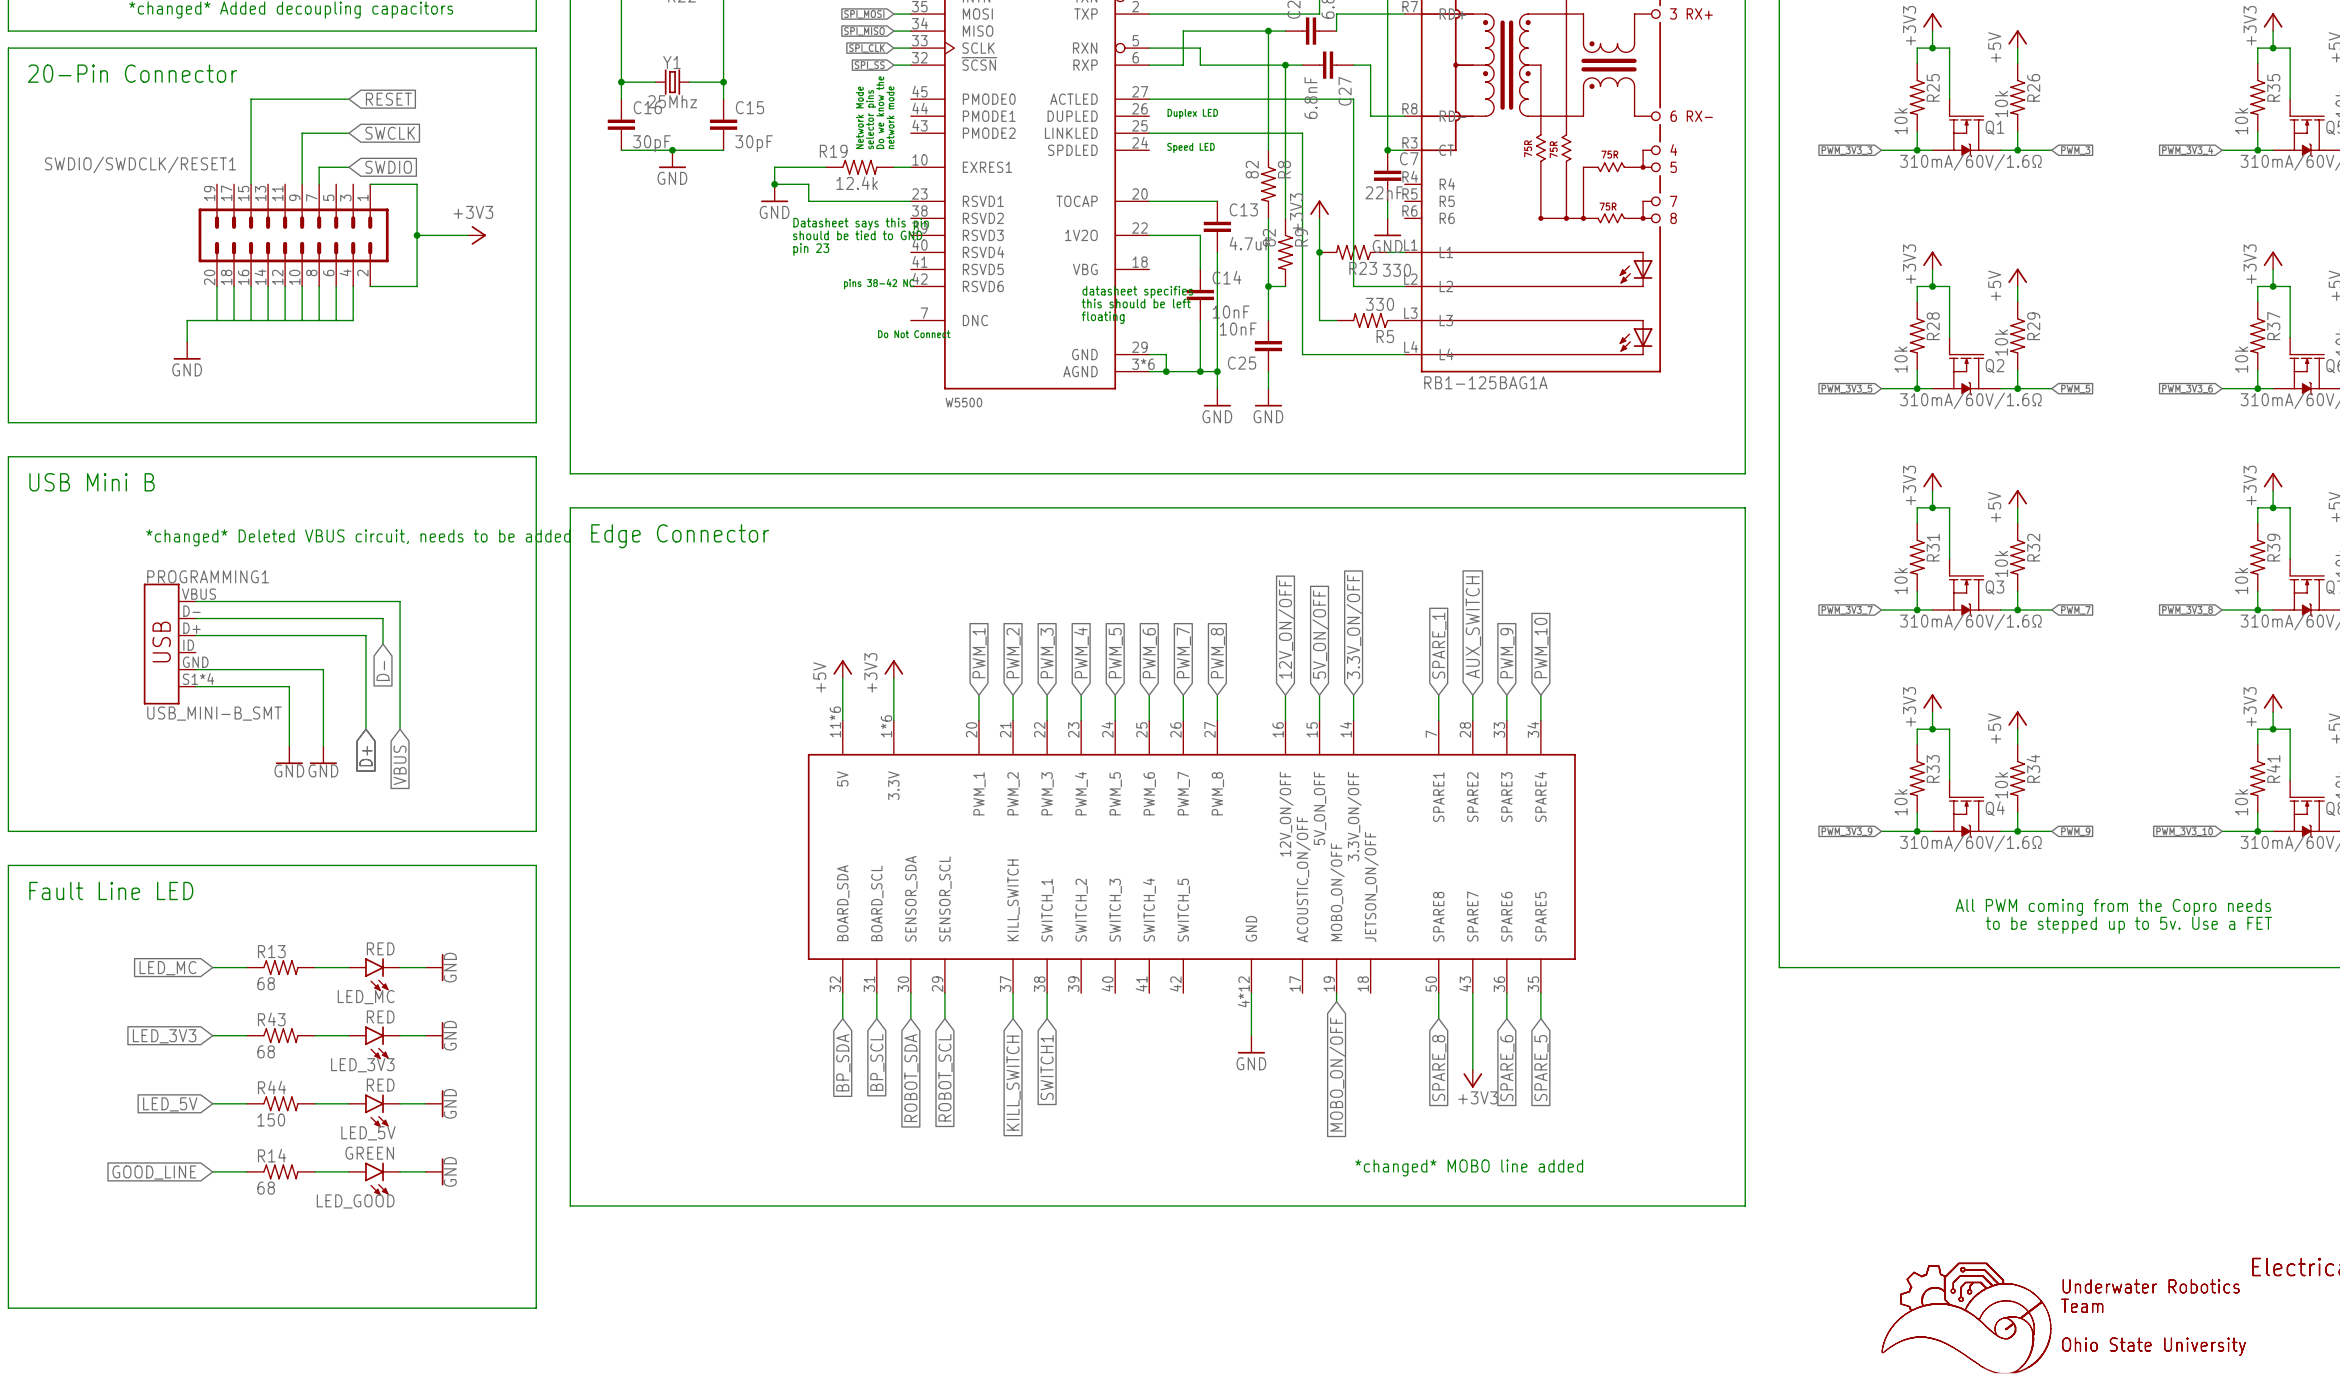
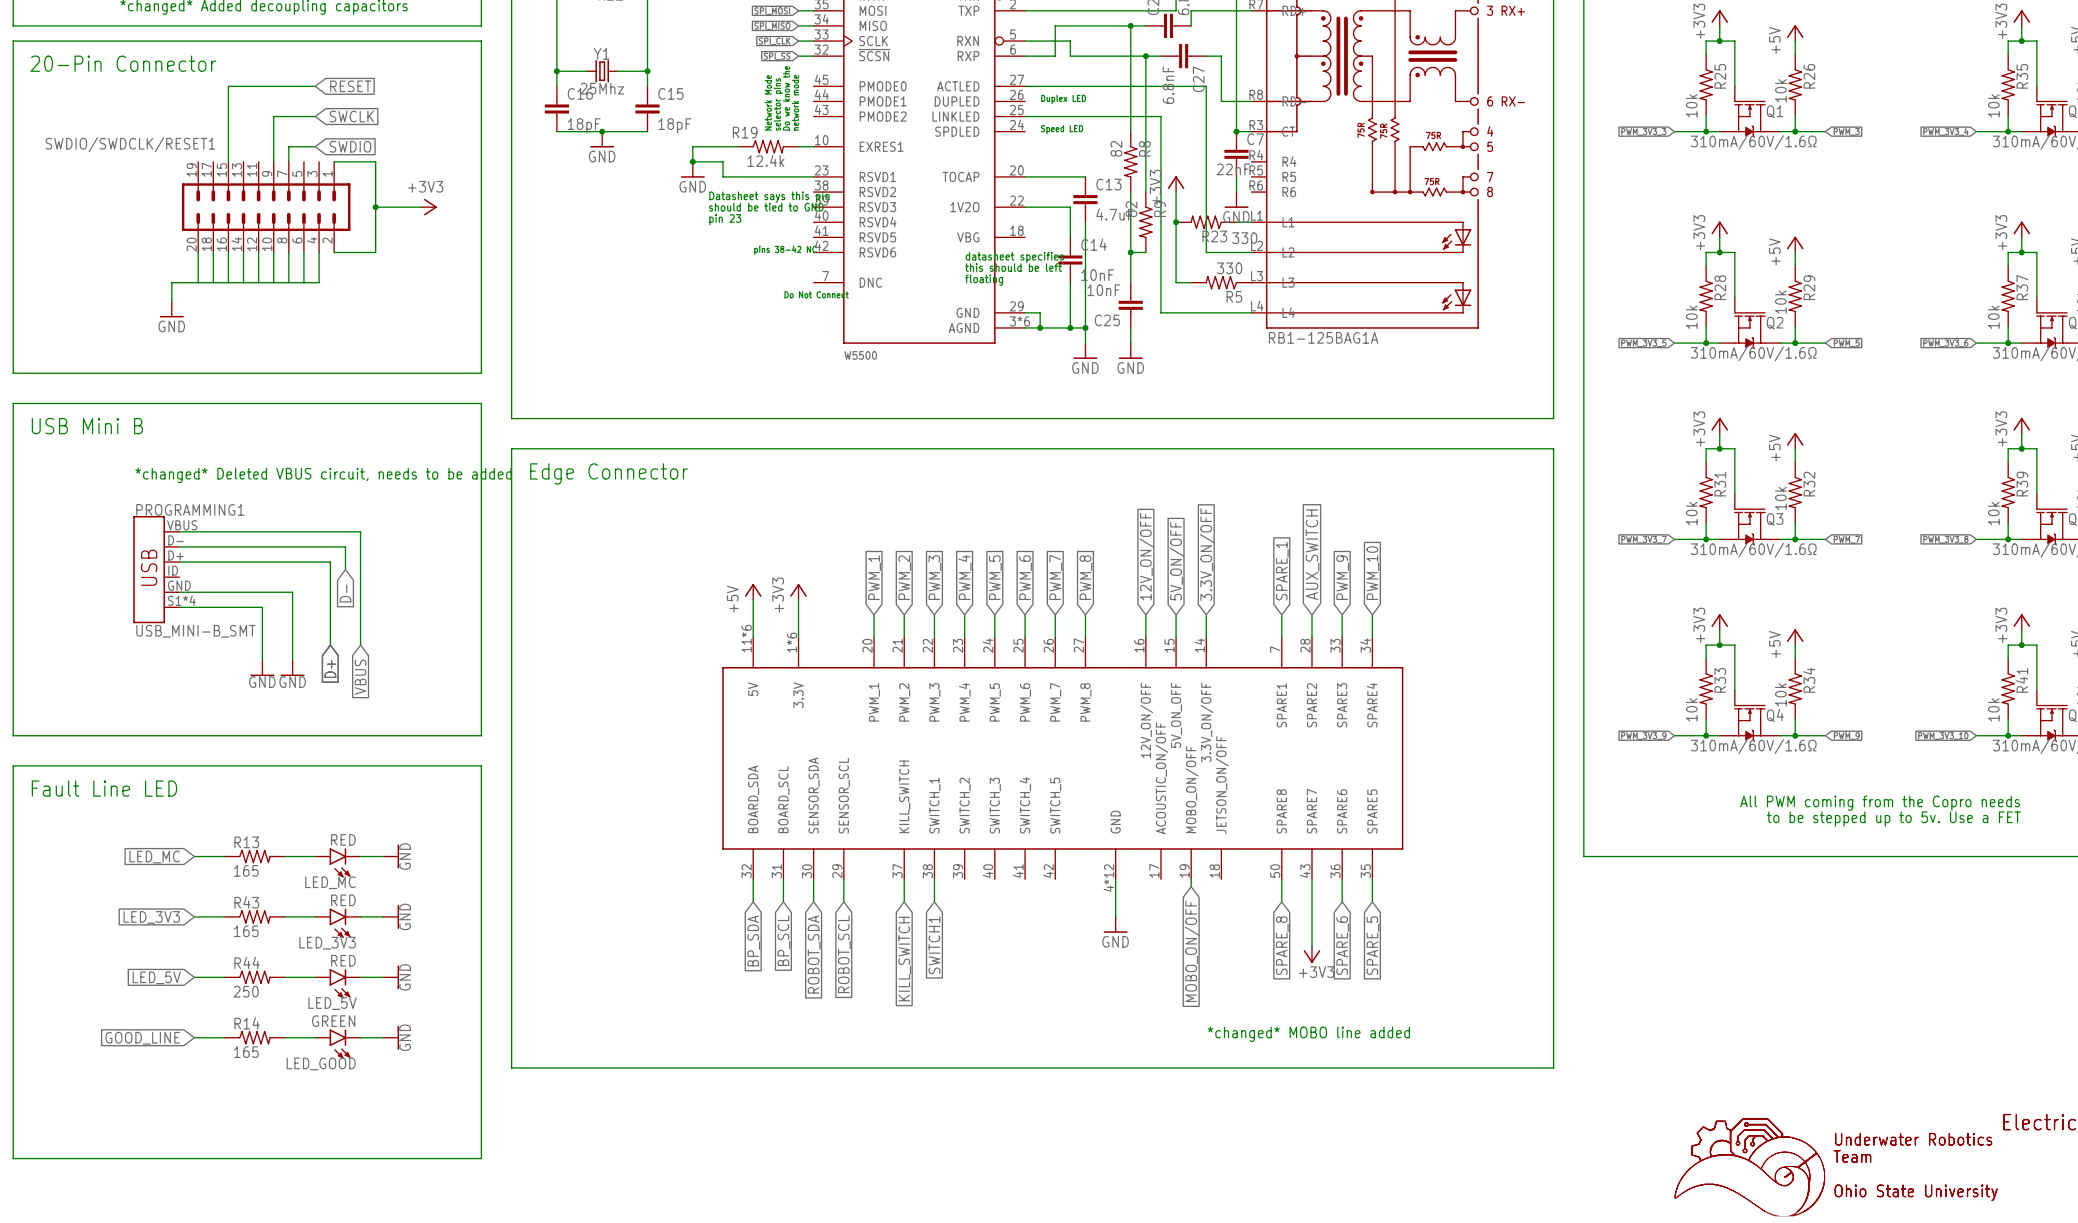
C16 value: 30pF (651, 143) -> 18pF (584, 125)
C15 value: 30pF (754, 143) -> 18pF (674, 125)
R13 value: 68 (266, 983) -> 165 (246, 870)
R43 value: 68 (266, 1051) -> 165 (246, 931)
R44 value: 150 (271, 1119) -> 250 (246, 991)
R14 value: 68 (266, 1188) -> 165 (246, 1052)

